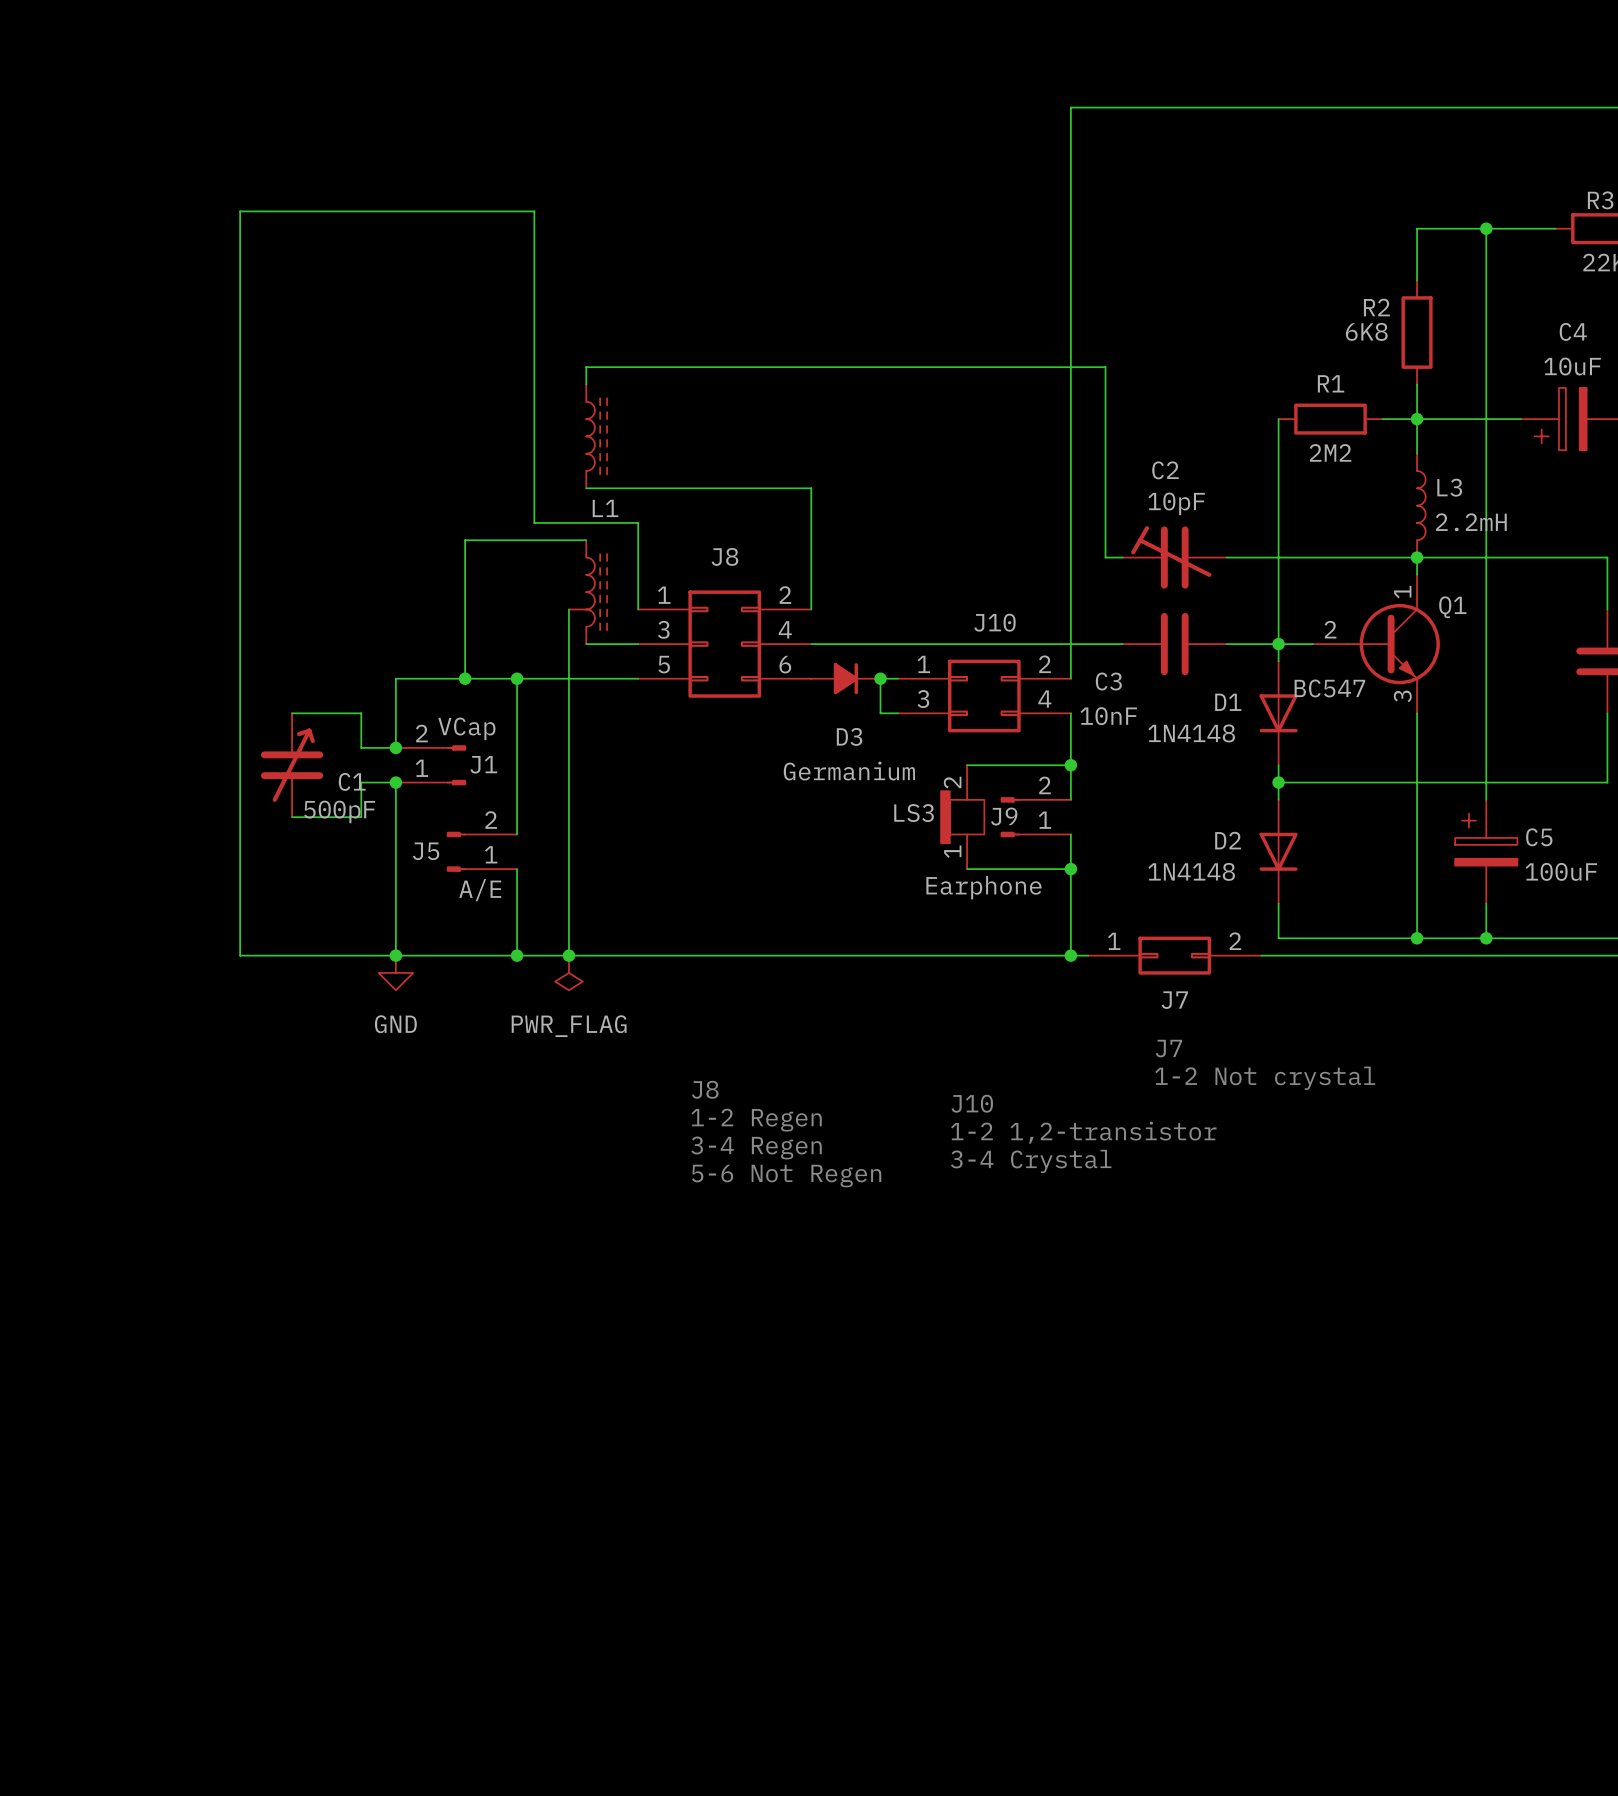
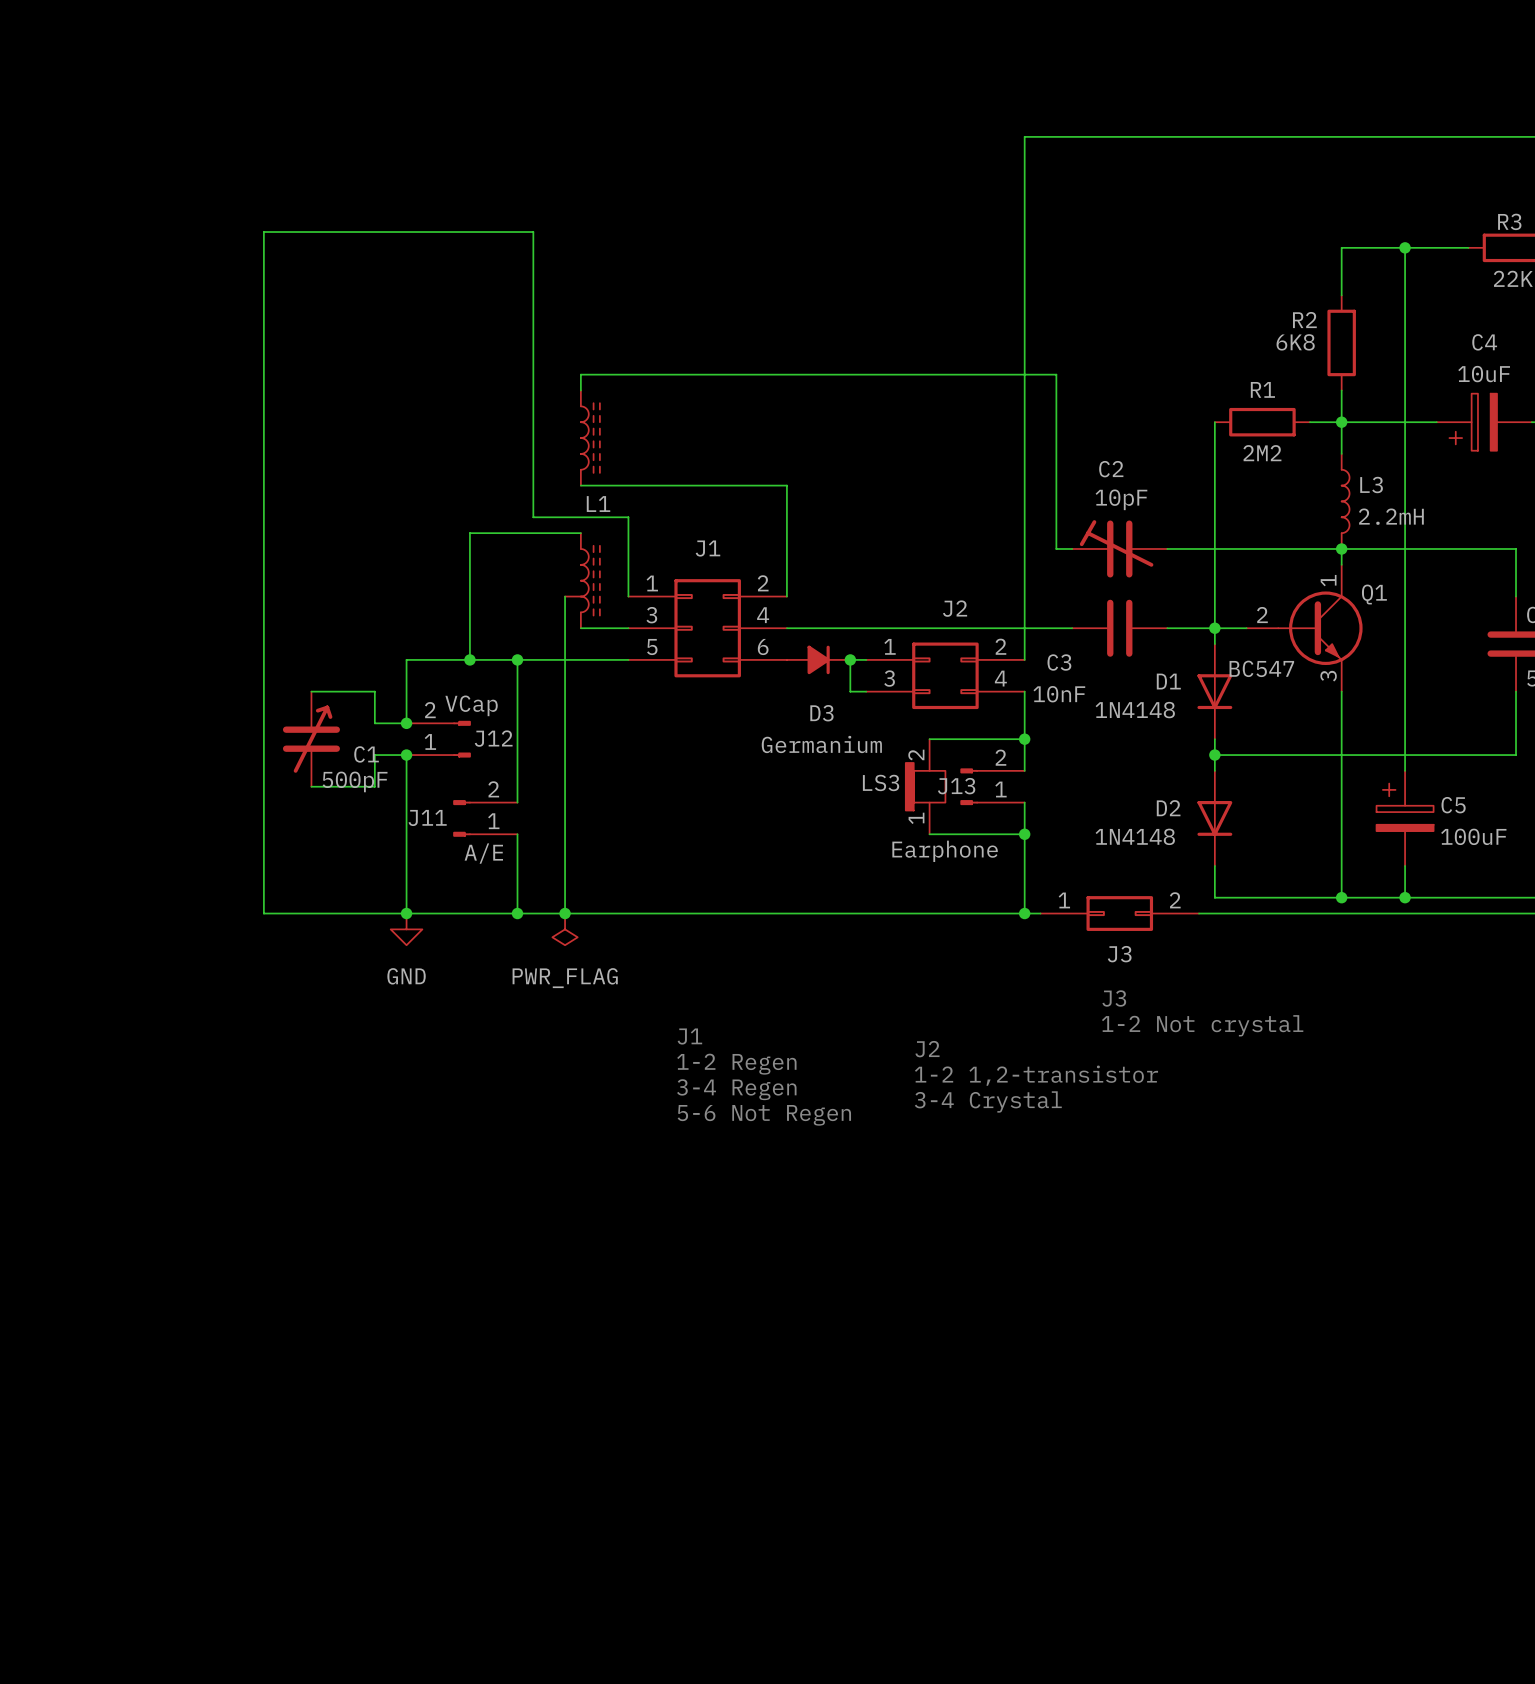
J8 name: J8 (724, 556) -> J1 (707, 548)
J10 name: J10 (994, 622) -> J2 (955, 608)
J1 name: J1 (483, 764) -> J12 (493, 738)
J9 name: J9 (1004, 816) -> J13 (956, 786)
J5 name: J5 (426, 851) -> J11 (427, 817)
J7 name: J7 (1174, 1000) -> J3 (1119, 954)
text: J7 (1168, 1048) -> J3 (1114, 998)
text: J8 (705, 1089) -> J1 (689, 1036)
text: J10 (972, 1103) -> J2 (927, 1049)

